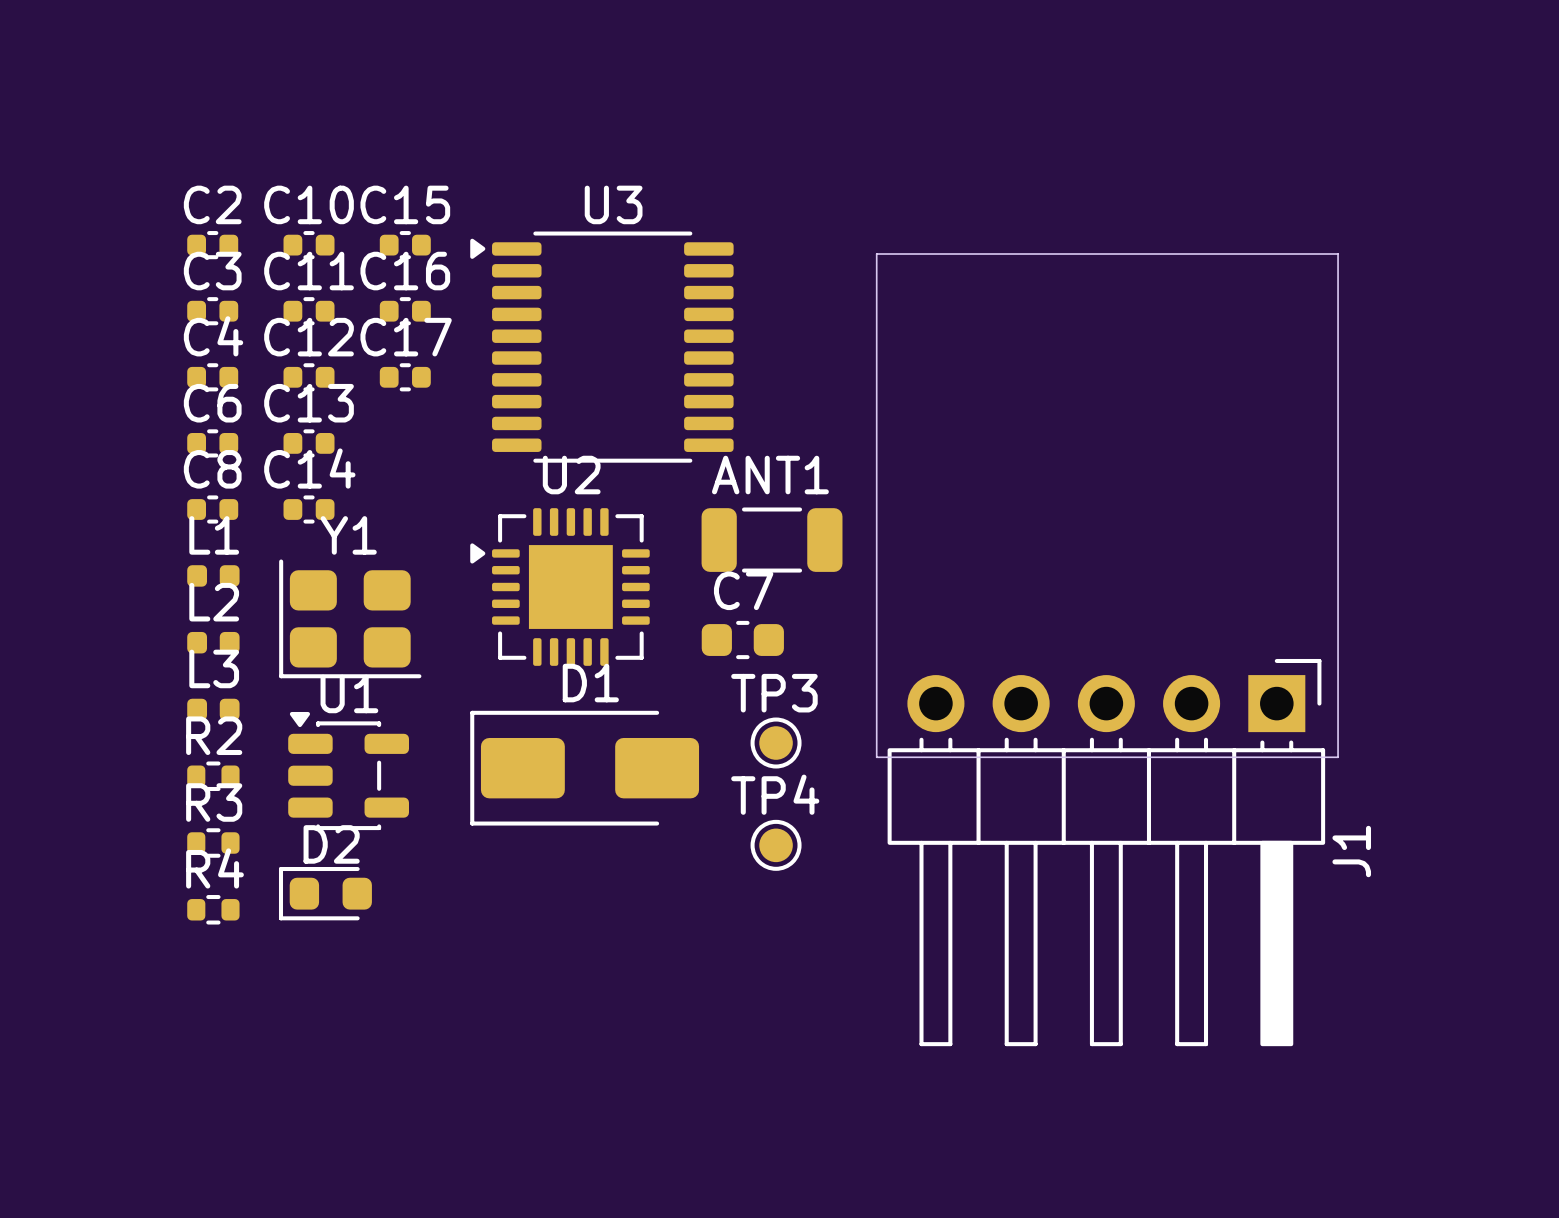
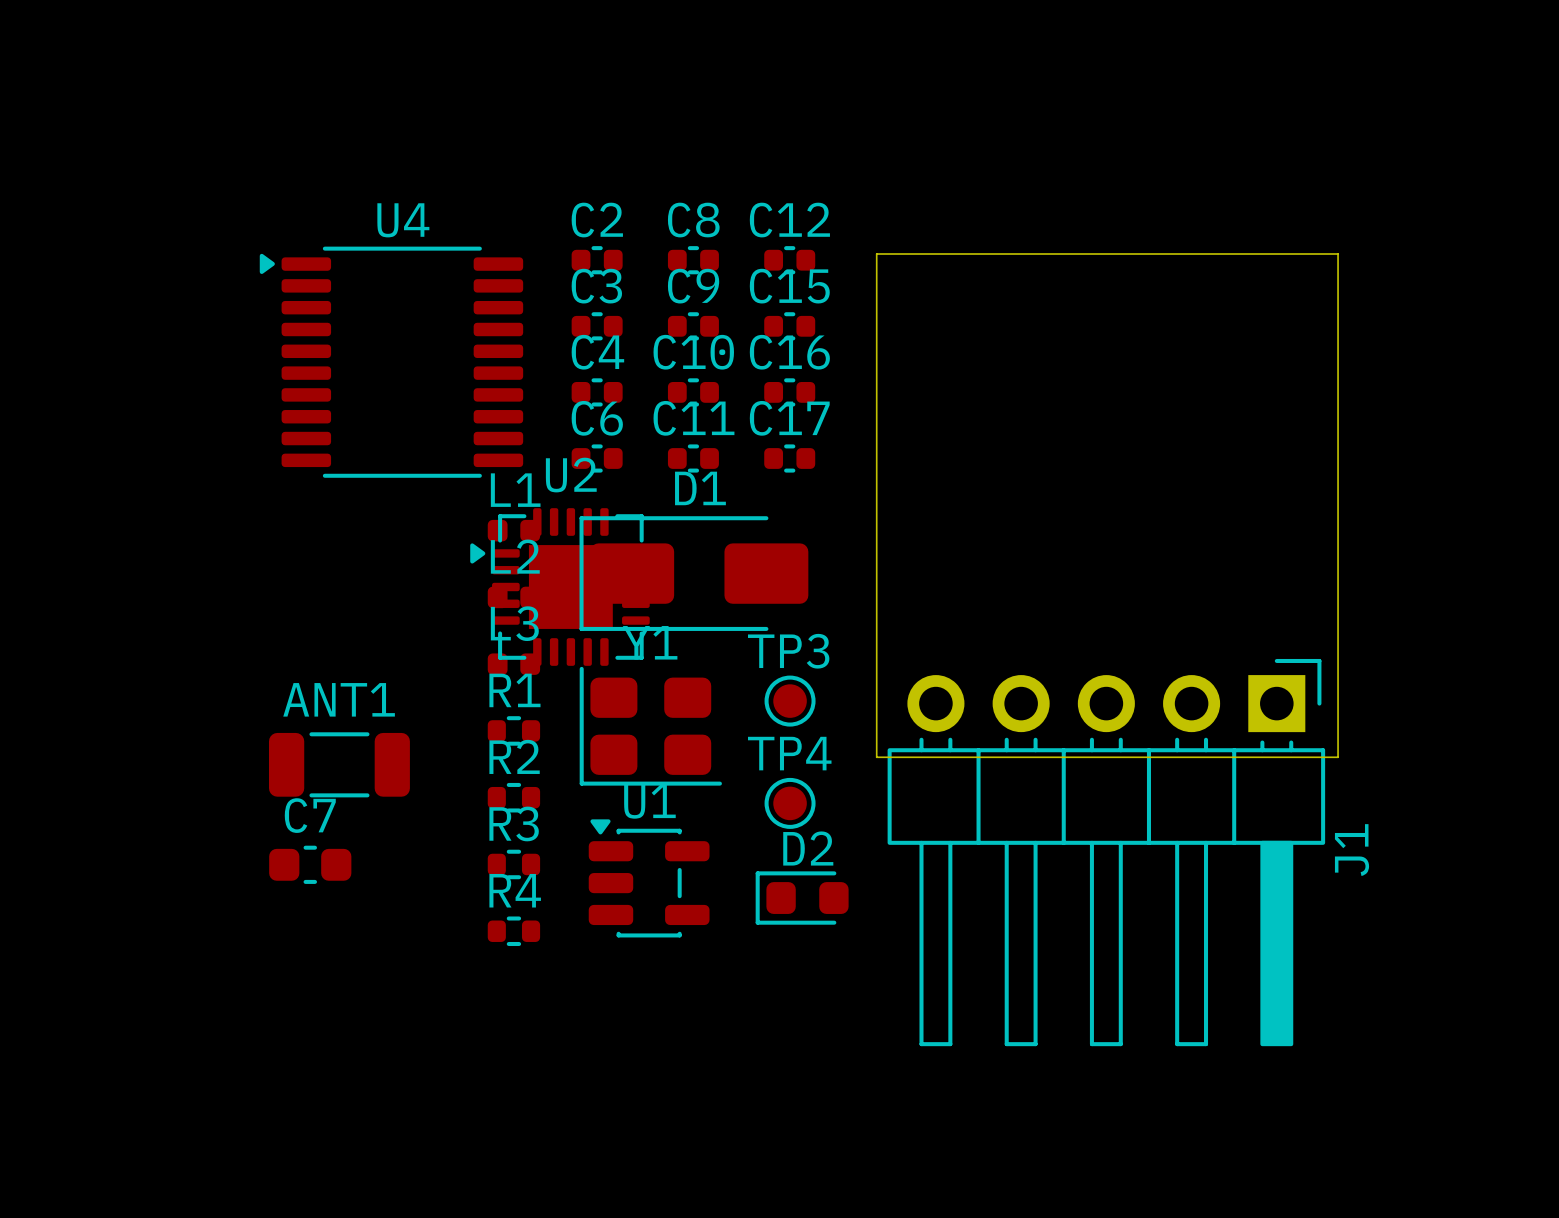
C2 position: (212, 245) -> (597, 260)
C10 position: (309, 245) -> (693, 392)
C15 position: (405, 245) -> (789, 326)
C3 position: (212, 311) -> (597, 326)
C11 position: (309, 311) -> (693, 458)
C16 position: (405, 311) -> (789, 392)
C9: none -> (693, 326)
U3: (601, 347) -> none
U4: none -> (391, 362)
C4 position: (212, 377) -> (597, 392)
C12 position: (309, 377) -> (789, 260)
C17 position: (405, 377) -> (789, 458)
C6 position: (212, 443) -> (597, 458)
C13: (309, 443) -> none
C8 position: (212, 509) -> (693, 260)
C14: (309, 509) -> none
ANT1 position: (772, 540) -> (339, 764)
L1 position: (213, 575) -> (513, 530)
Y1 position: (350, 618) -> (650, 726)
C7 position: (742, 640) -> (310, 864)
L2 position: (213, 642) -> (513, 597)
L3 position: (213, 709) -> (513, 664)
R1: none -> (513, 730)
TP3 position: (776, 743) -> (790, 701)
D1 position: (584, 768) -> (693, 573)
U1 position: (348, 771) -> (649, 878)
R2 position: (213, 776) -> (513, 797)
R3 position: (213, 843) -> (513, 864)
TP4 position: (776, 845) -> (790, 803)
D2 position: (325, 893) -> (802, 898)
R4 position: (213, 909) -> (513, 931)

